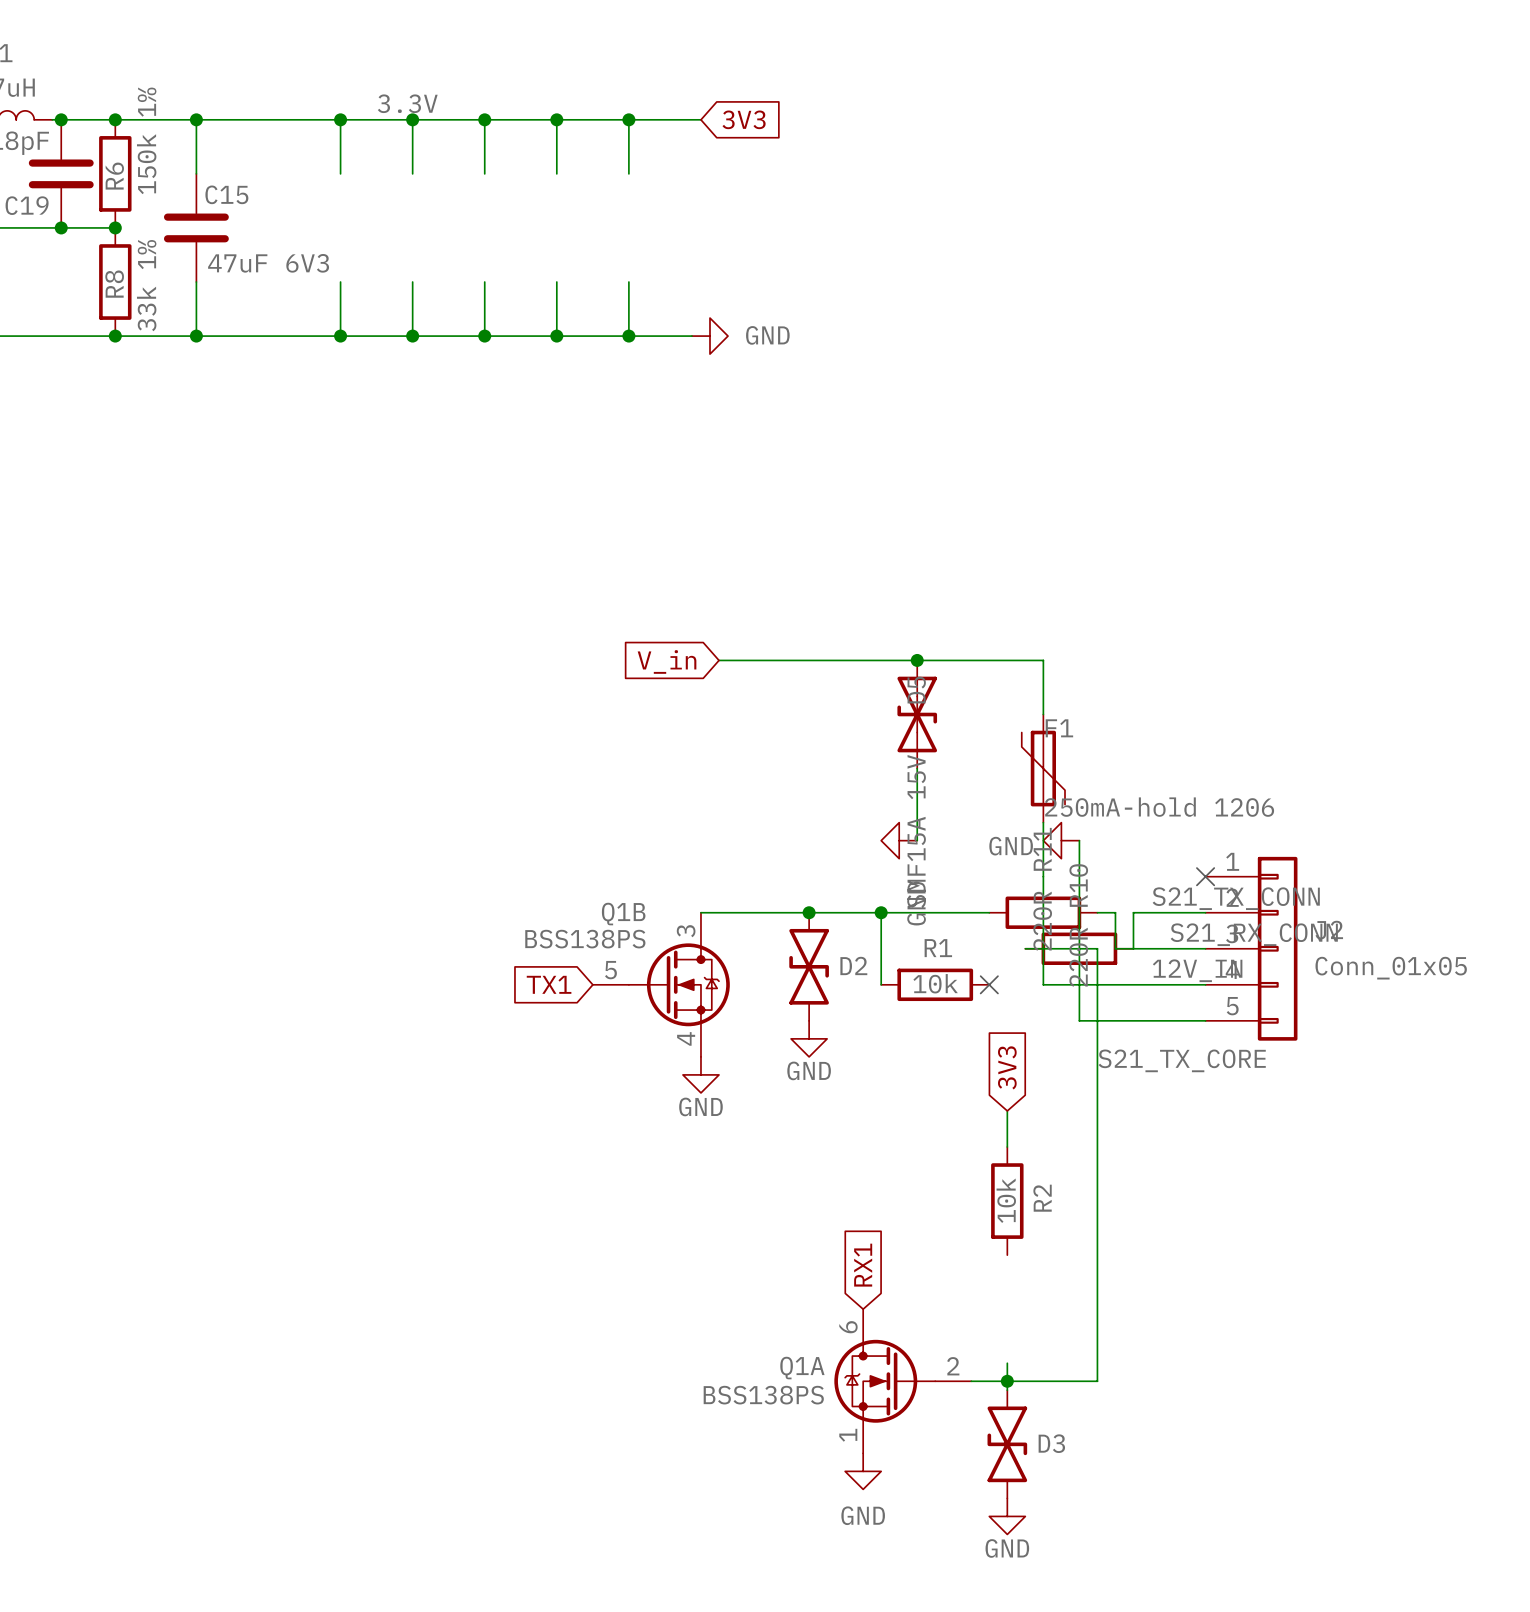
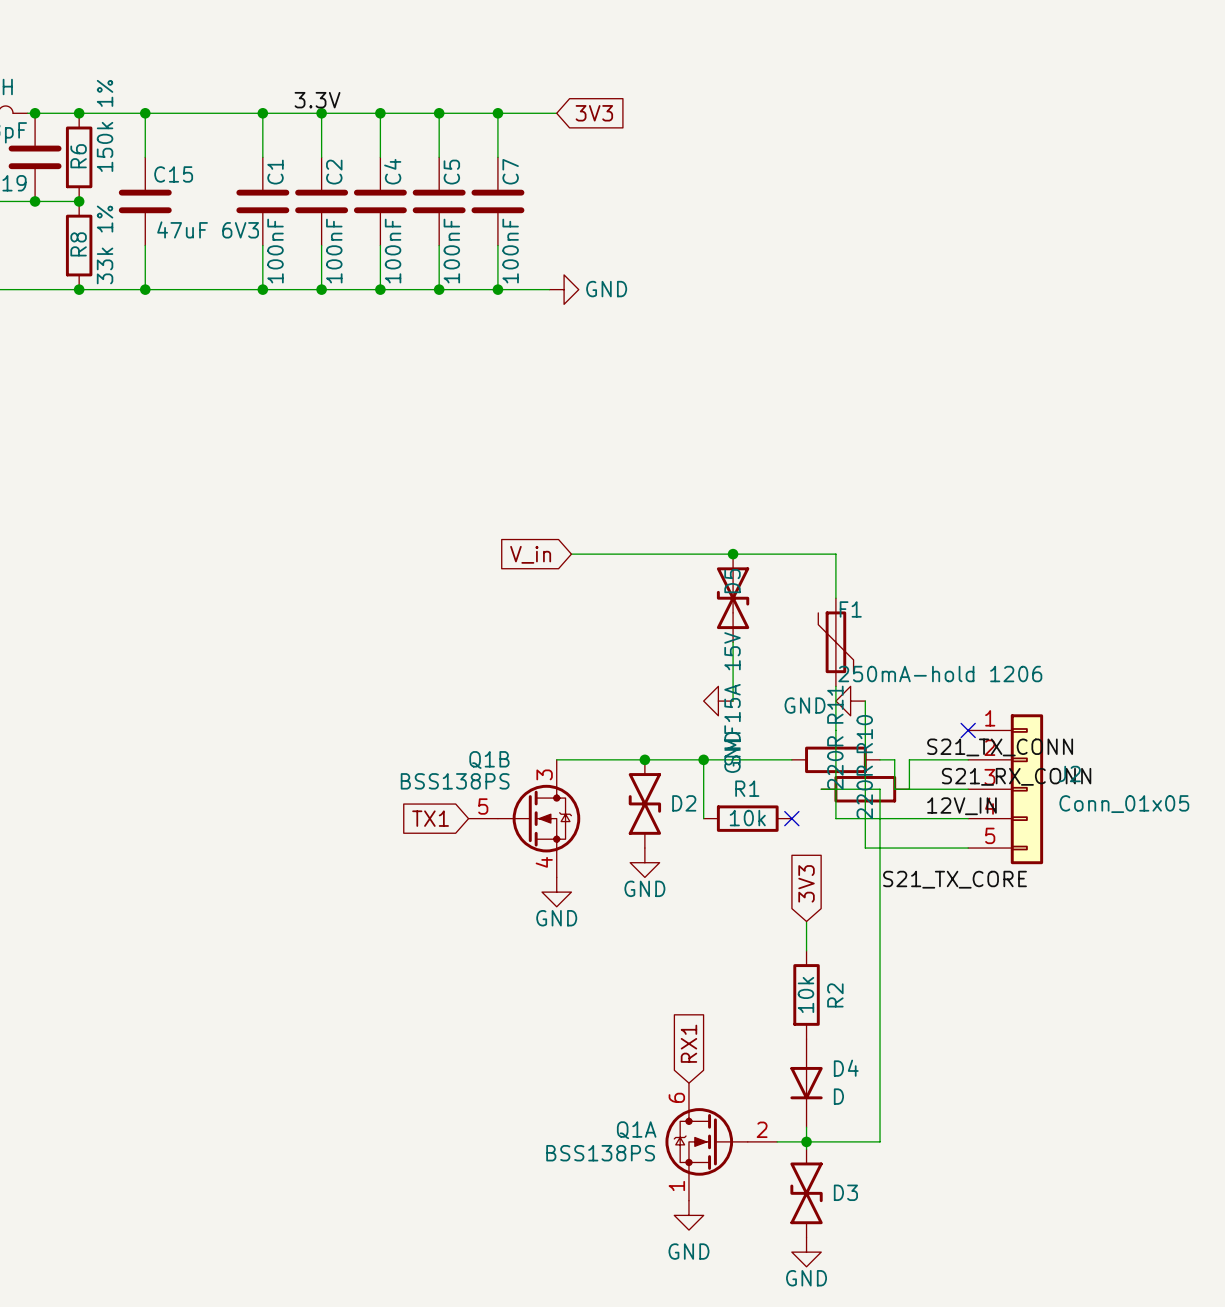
C1: none -> 100nF (262, 201)
C2: none -> 100nF (321, 201)
C4: none -> 100nF (380, 201)
C5: none -> 100nF (439, 201)
C7: none -> 100nF (497, 201)
D4: none -> D (806, 1083)

